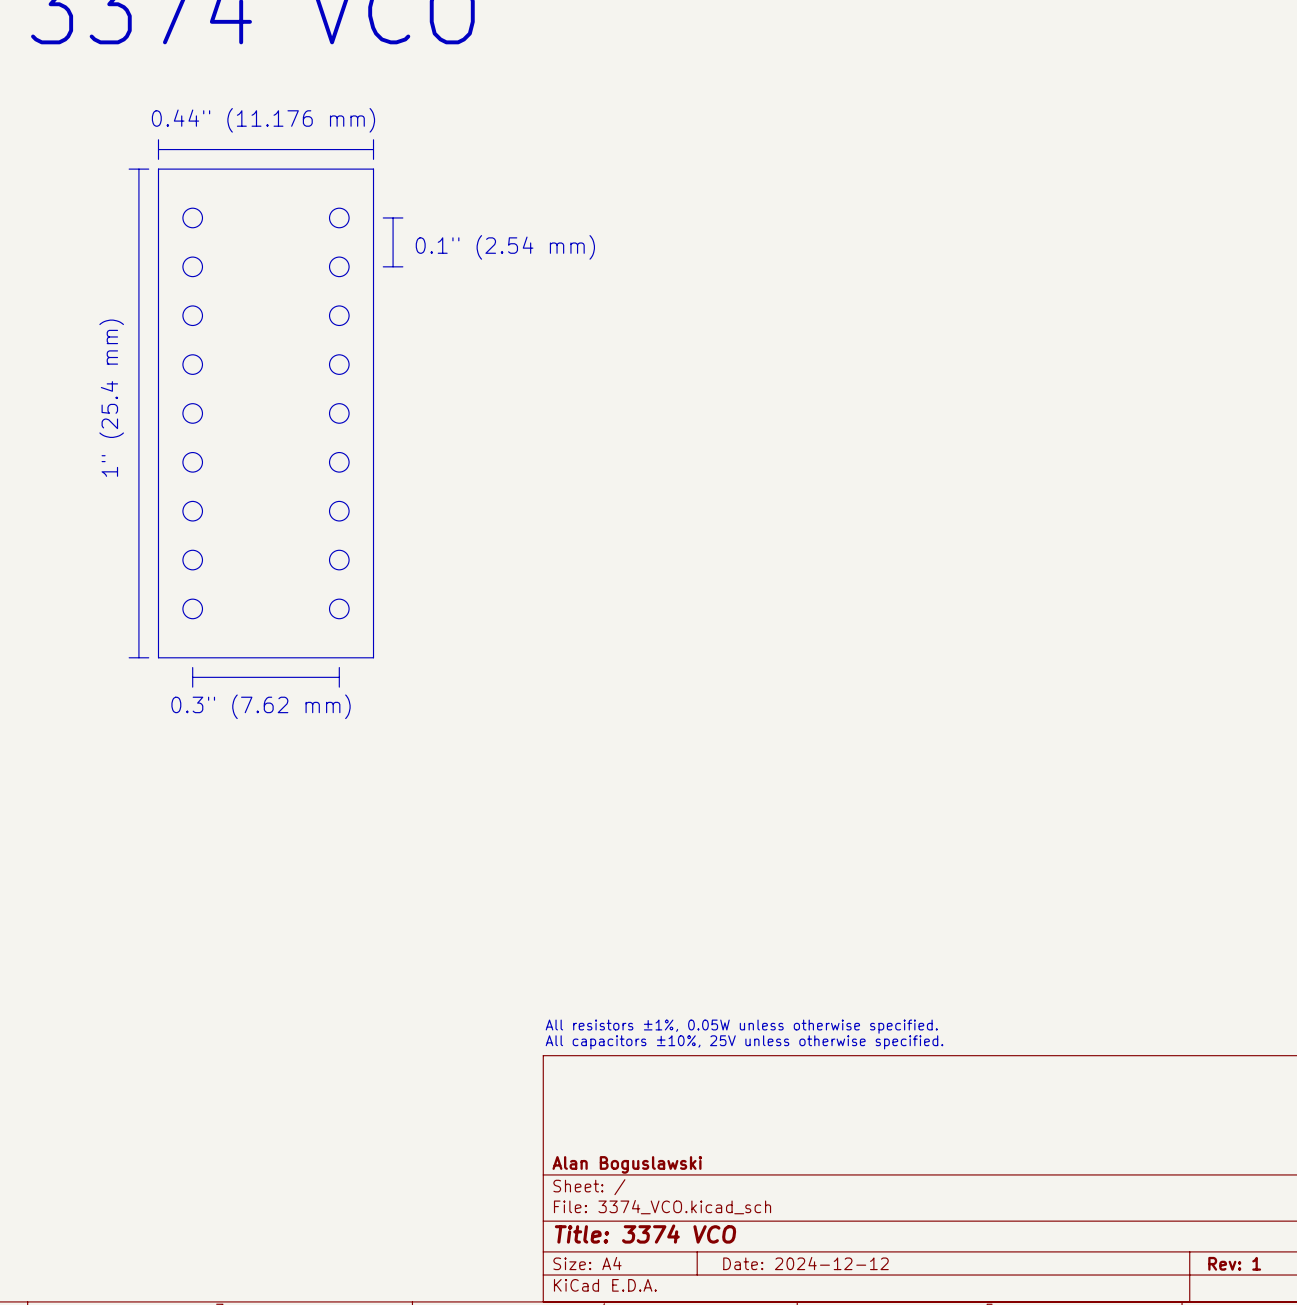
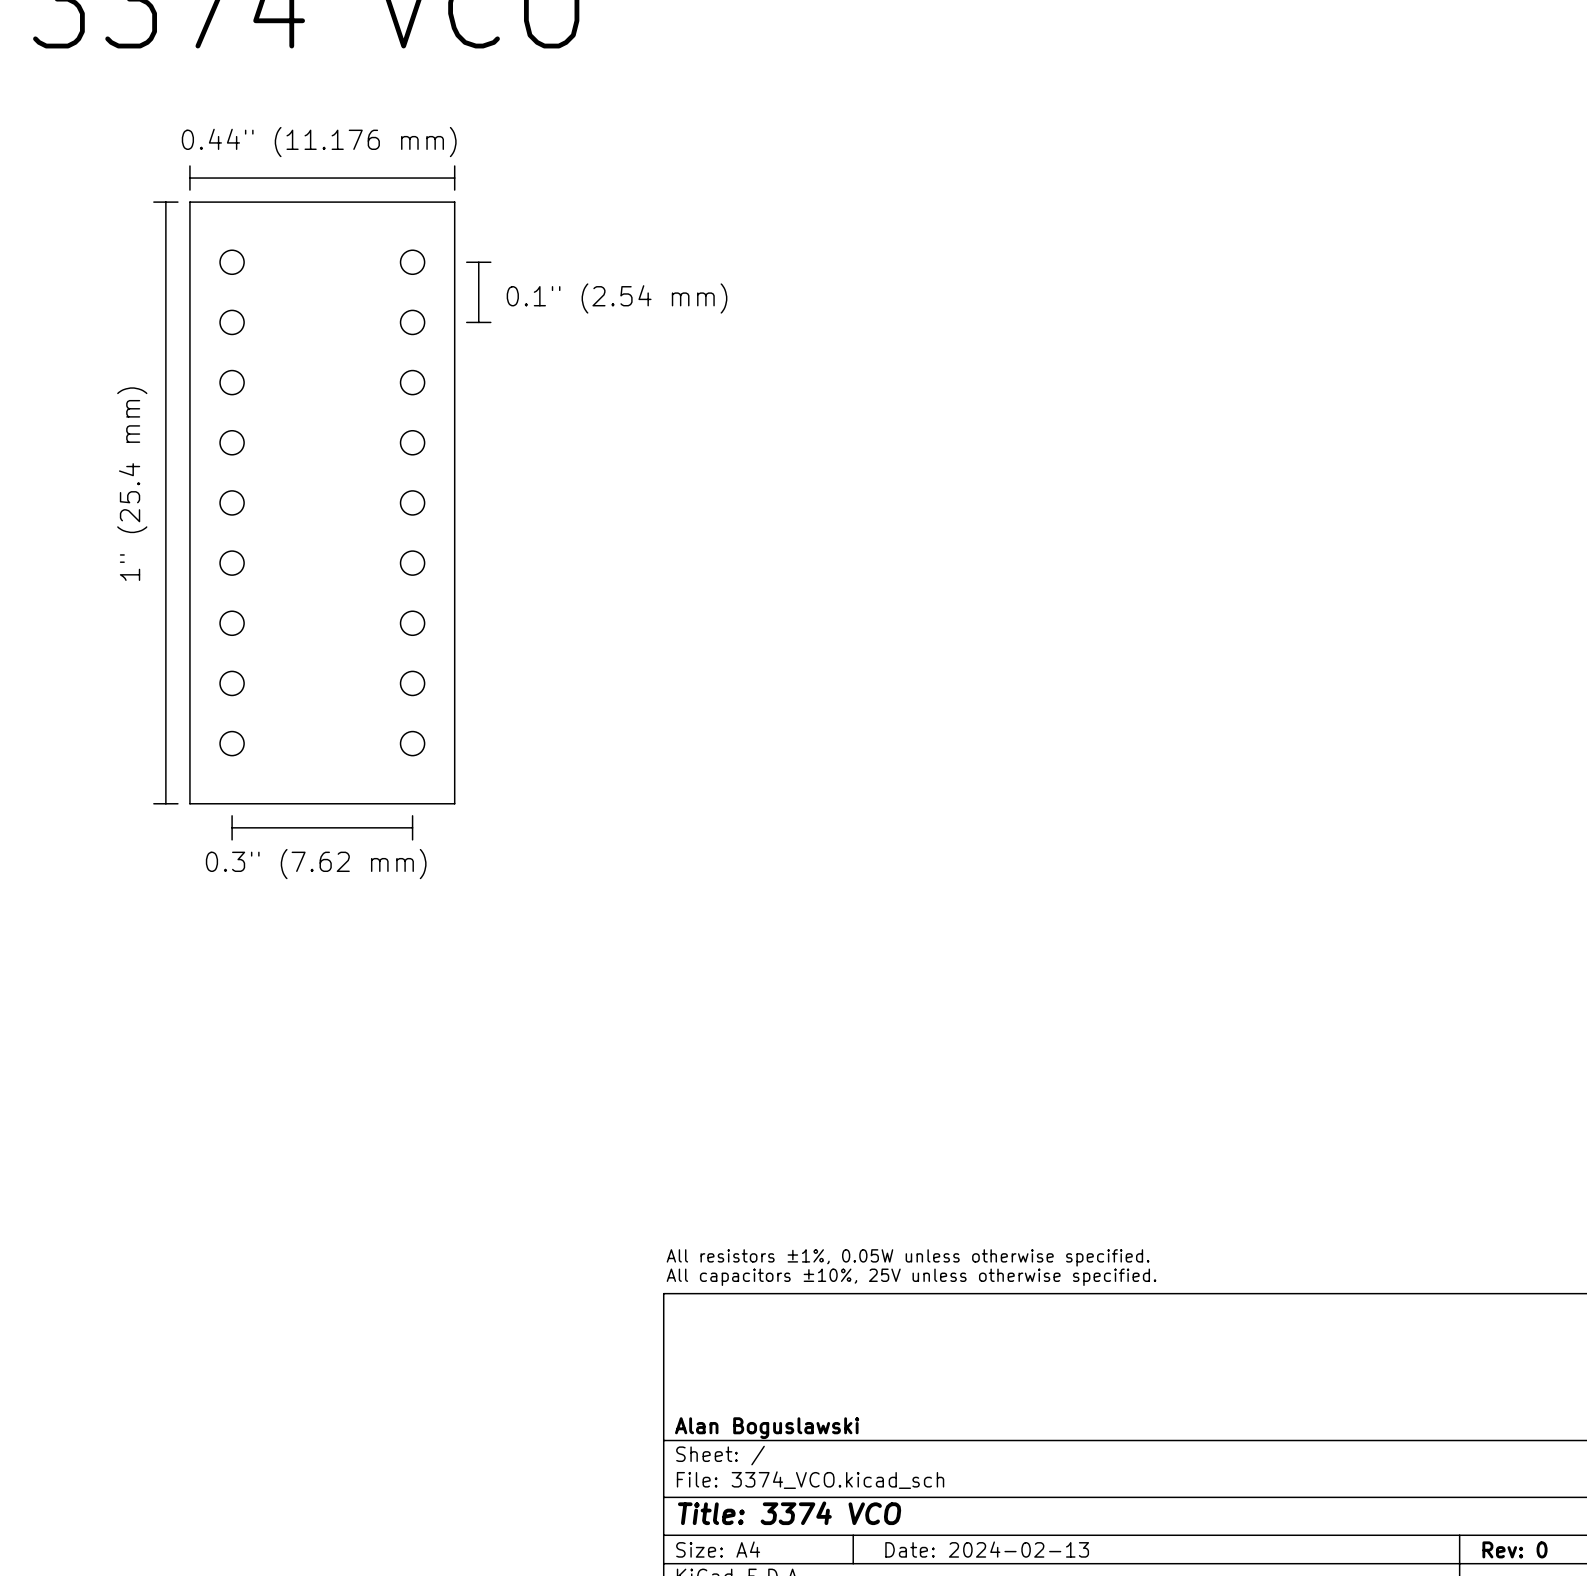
title block: Date: 2024-12-12 (805, 1263) -> Date: 2024-02-13 (987, 1549)
title block: Rev: 1 (1234, 1263) -> Rev: 0 (1514, 1549)

